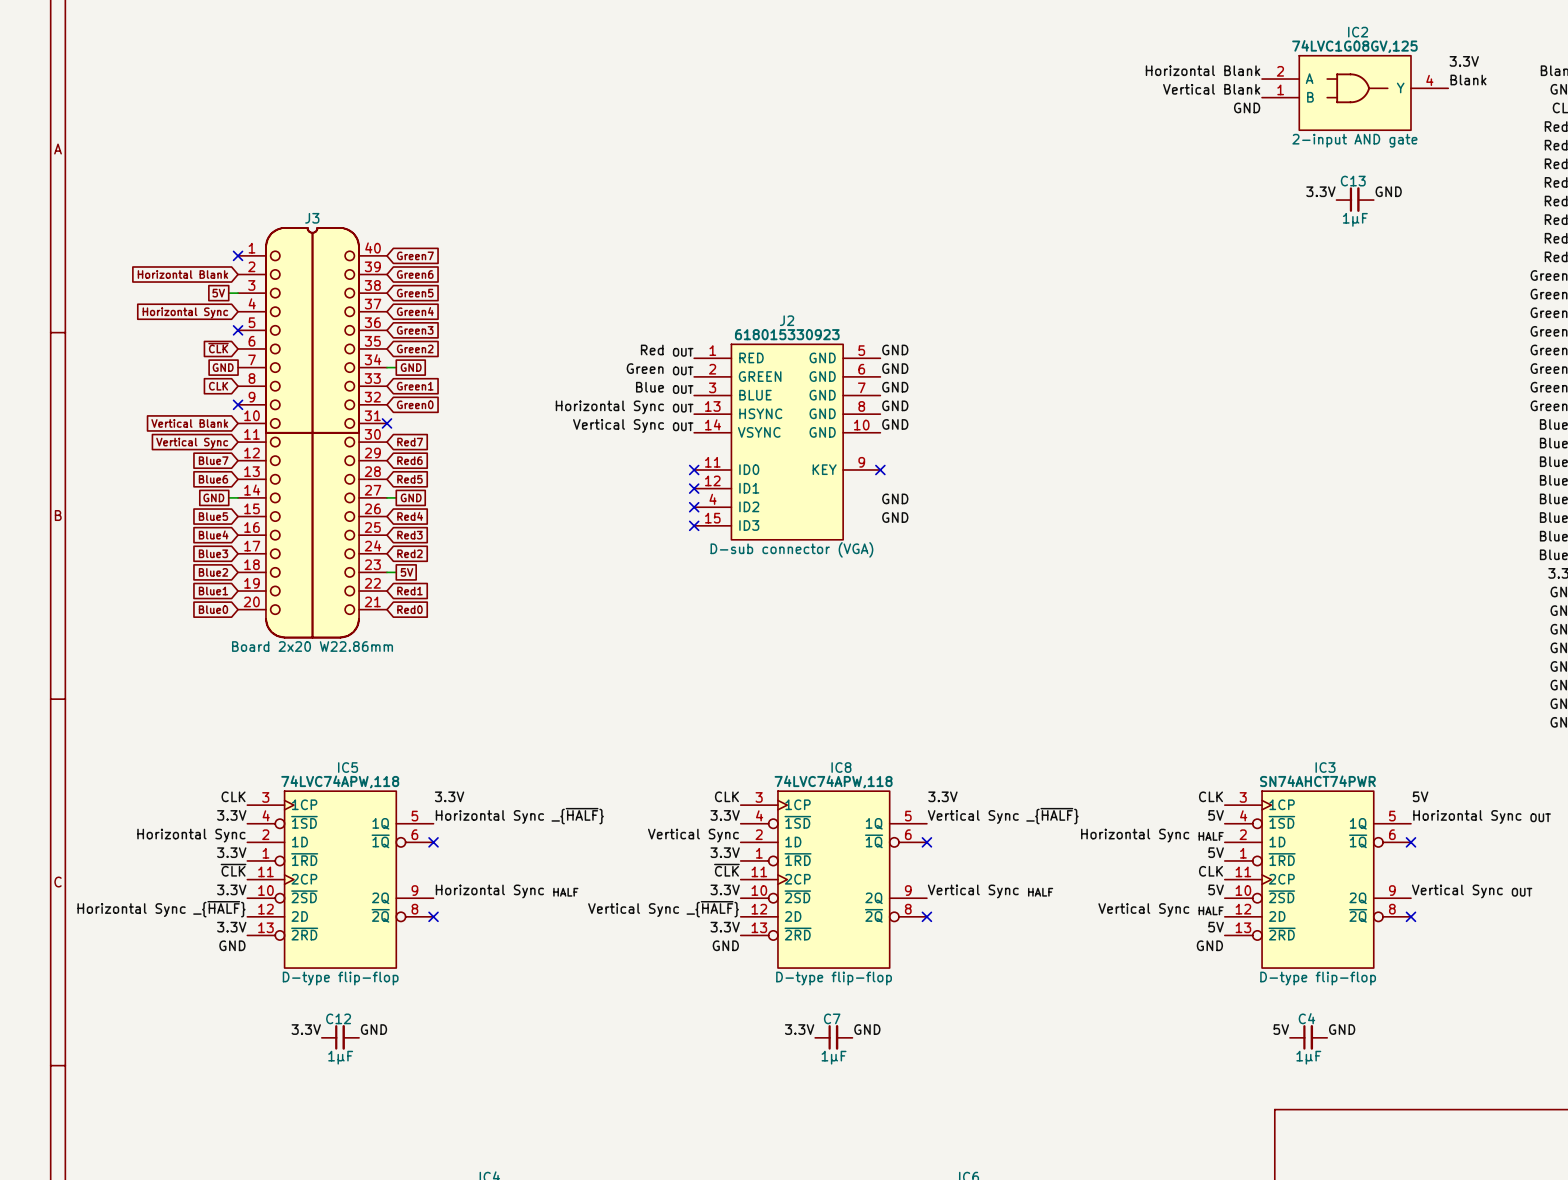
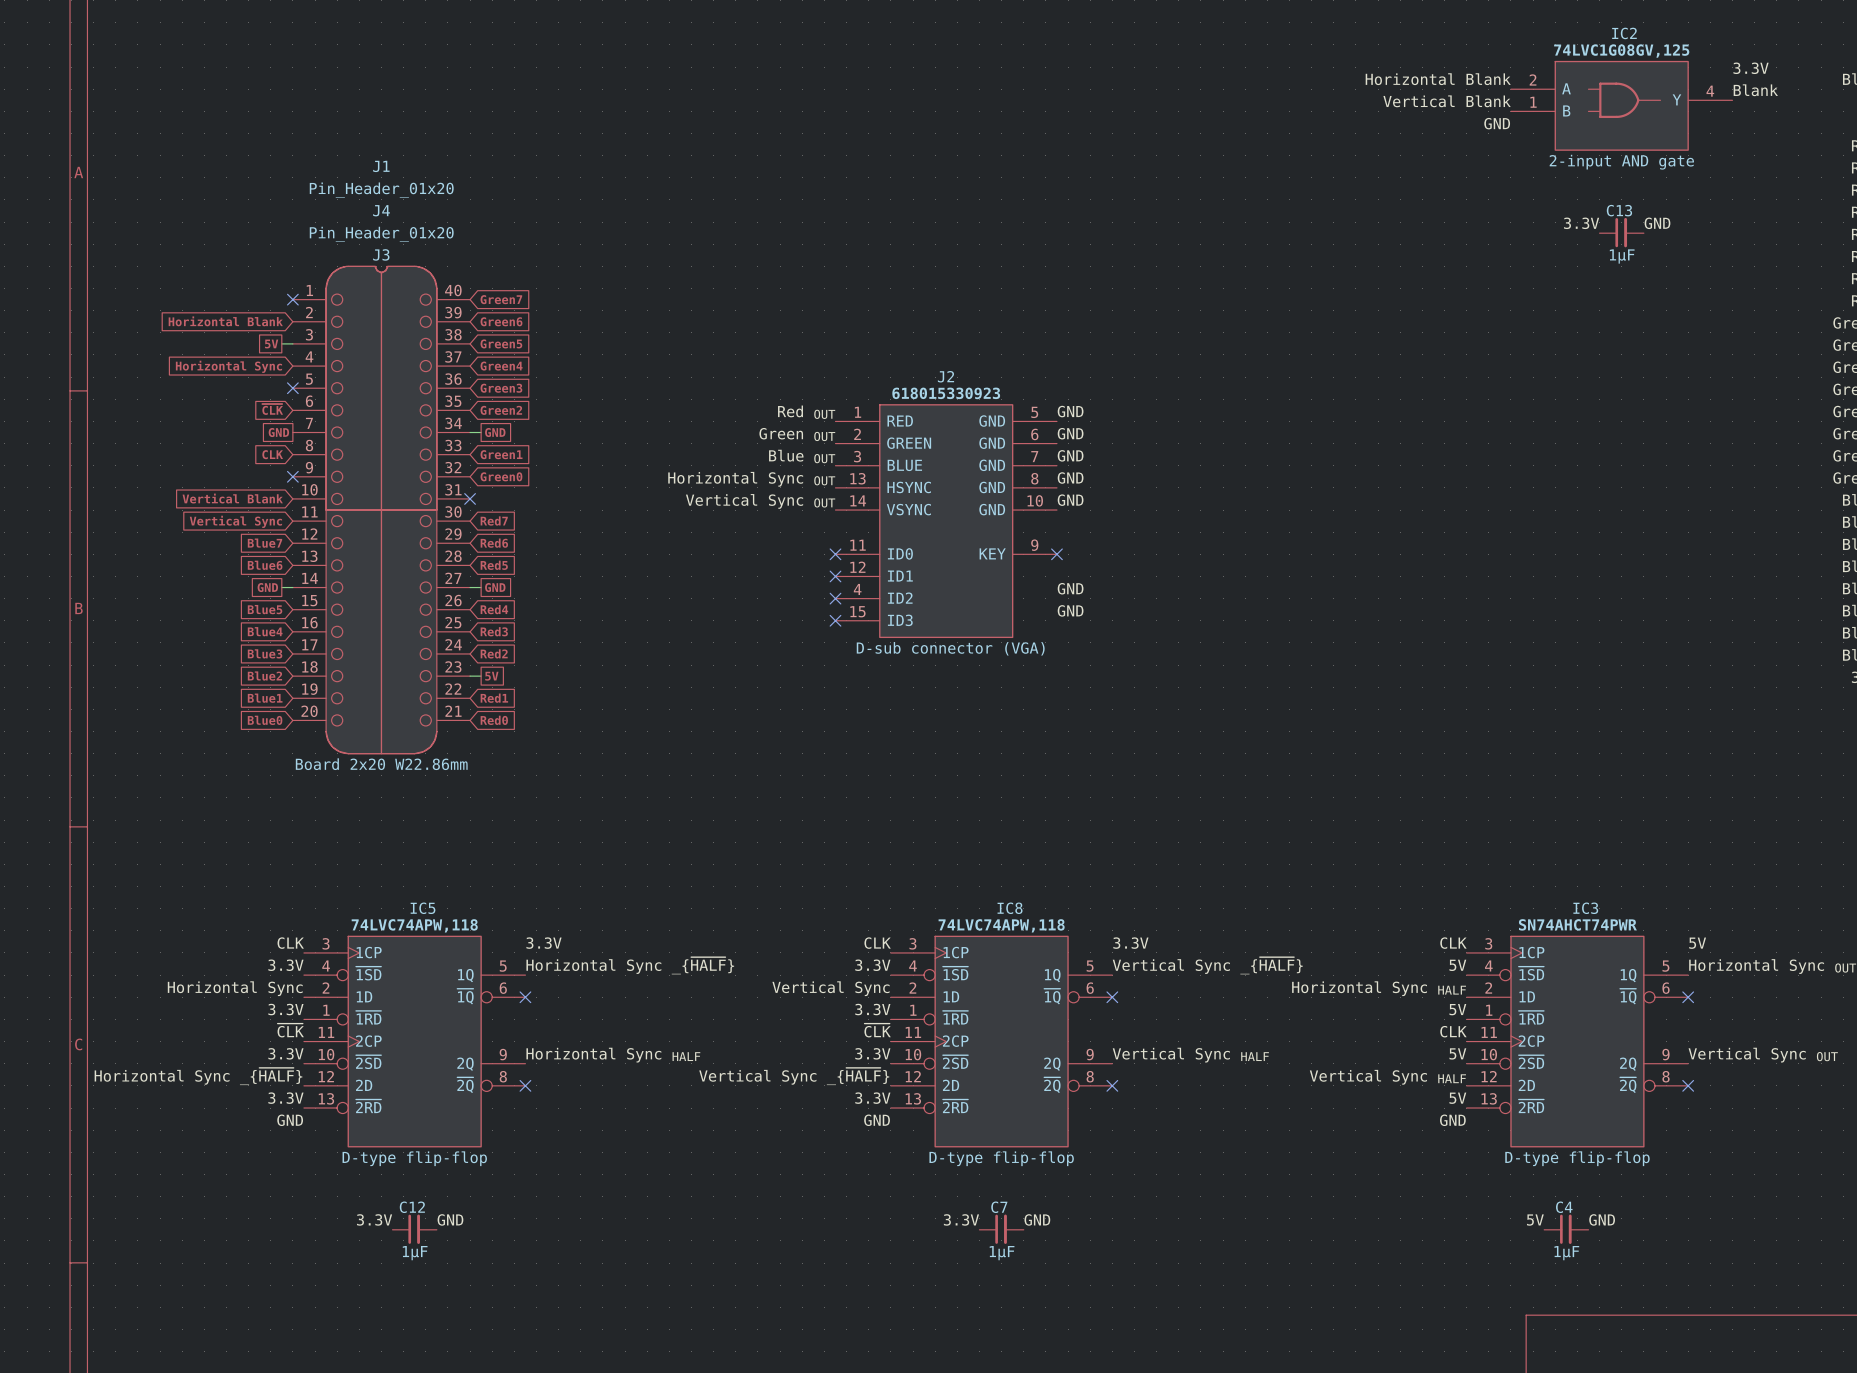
J1: none -> Pin_Header_01x20 (381, 179)
J4: none -> Pin_Header_01x20 (381, 223)

